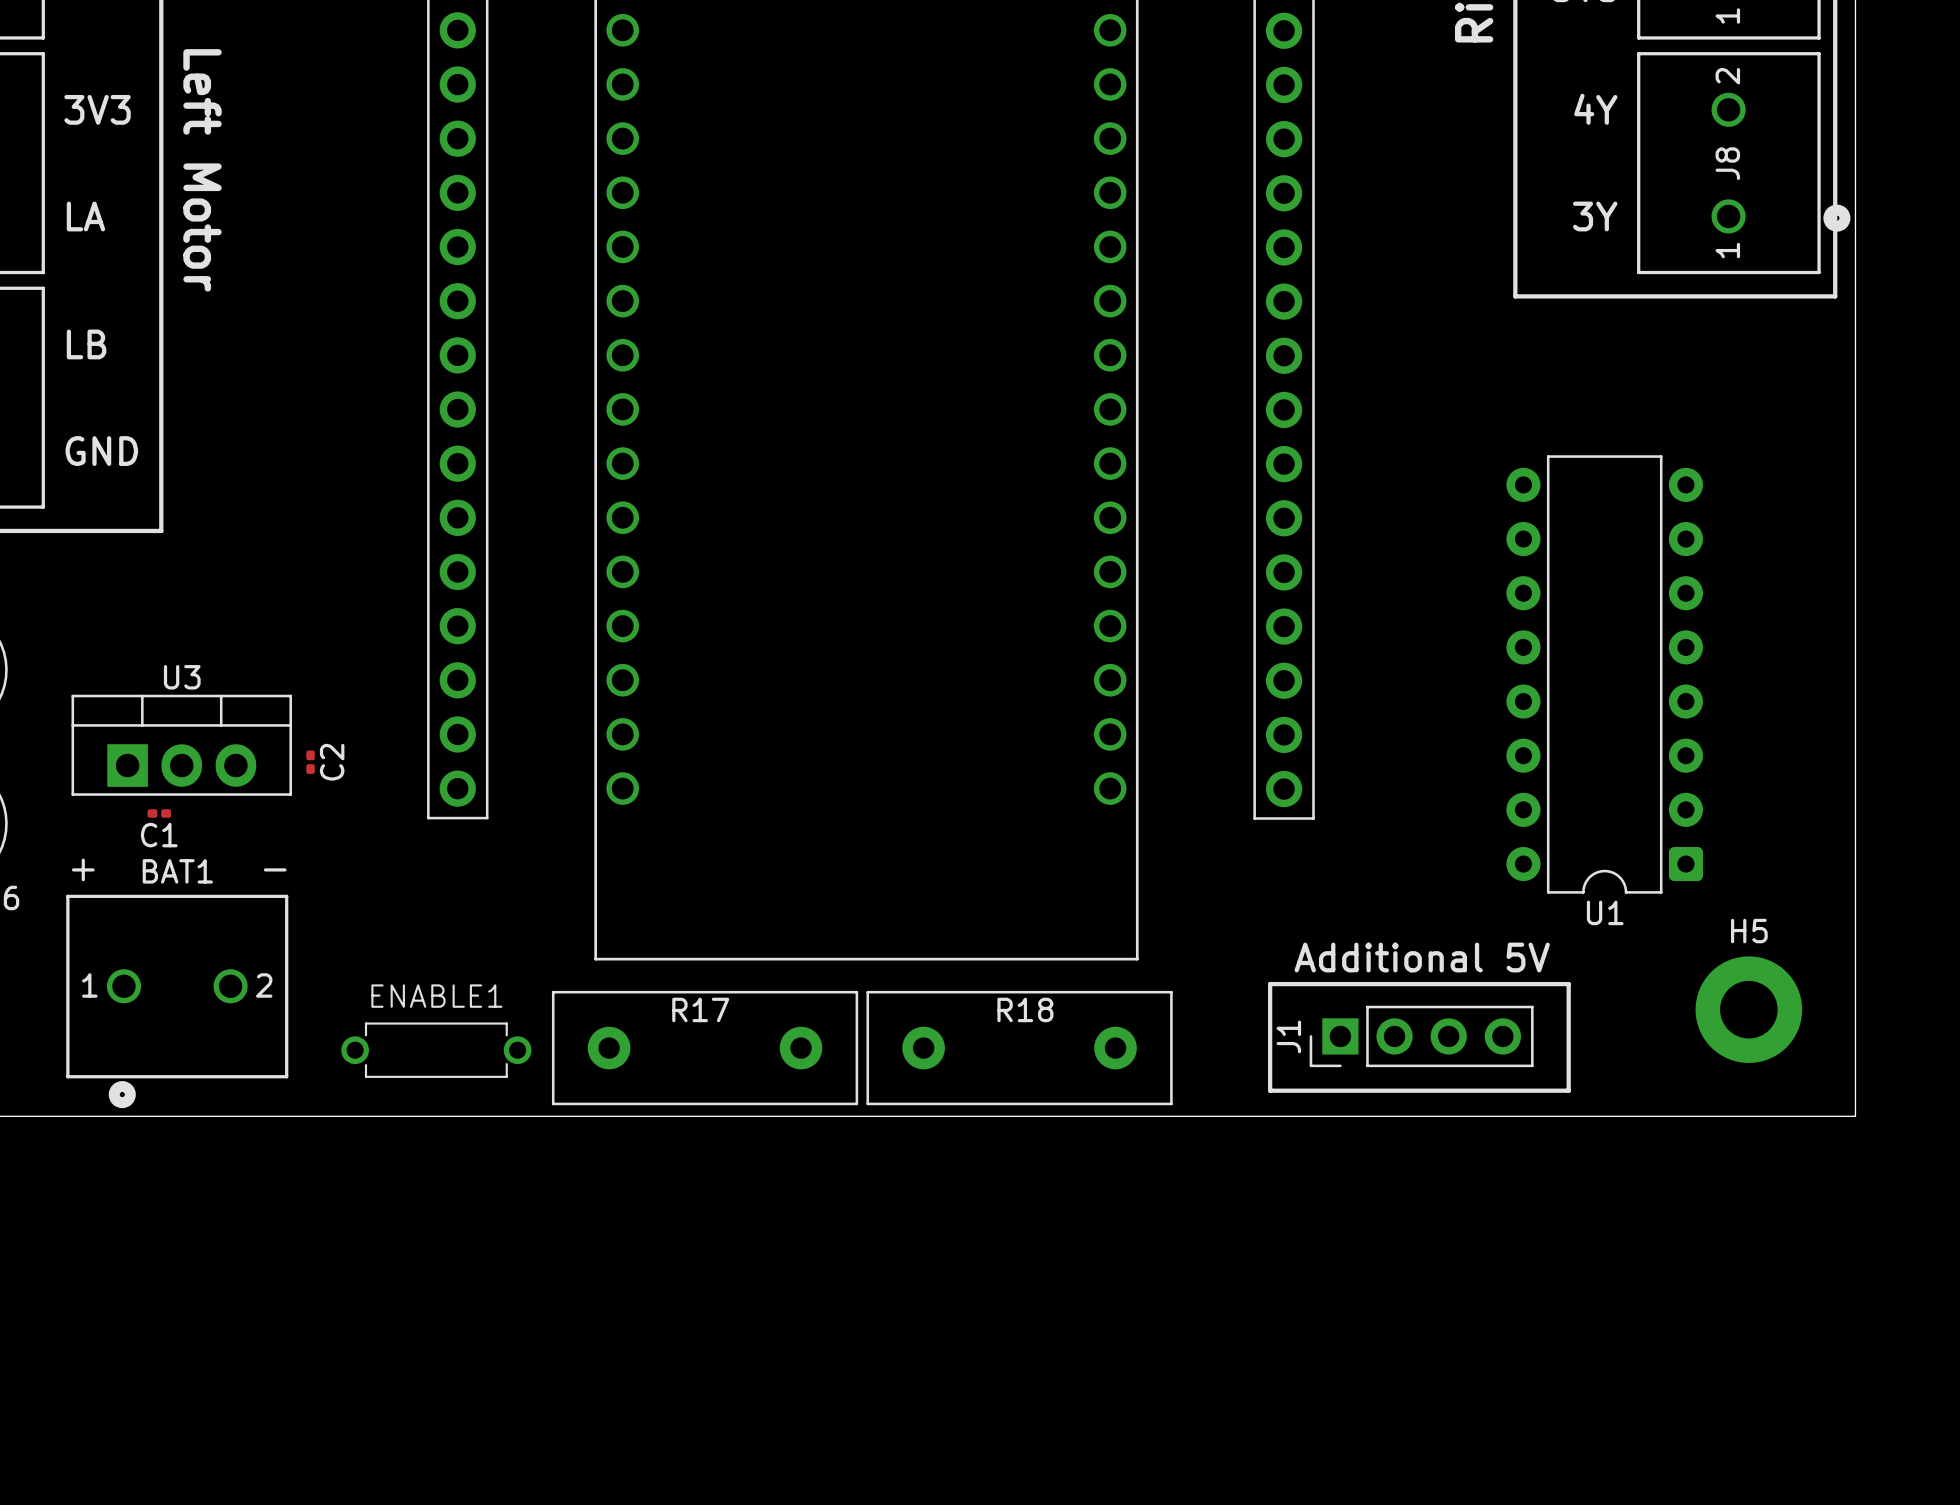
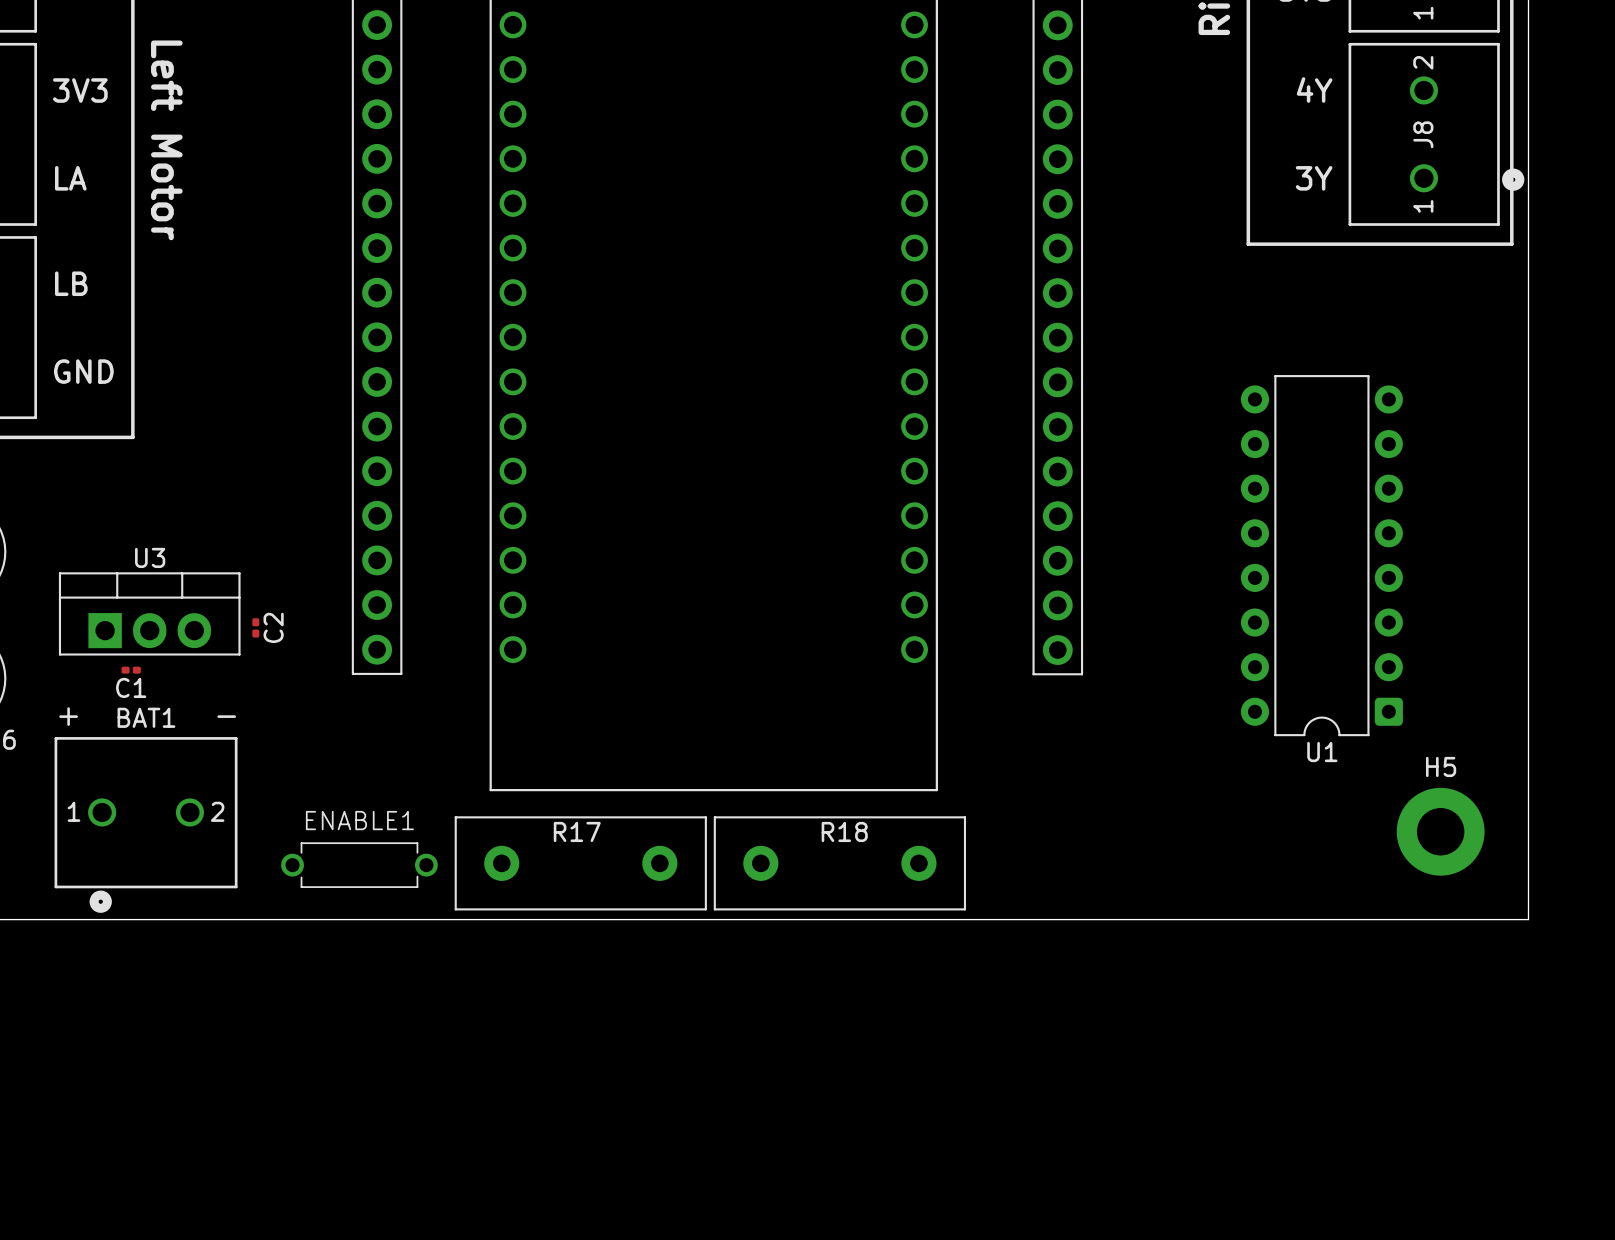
text: Additional 5V (1422, 957) -> none
line: (1270, 984) (1568, 984) (1568, 1090) (1270, 1090) (1270, 984) -> none
J1: (1421, 1036) -> none

